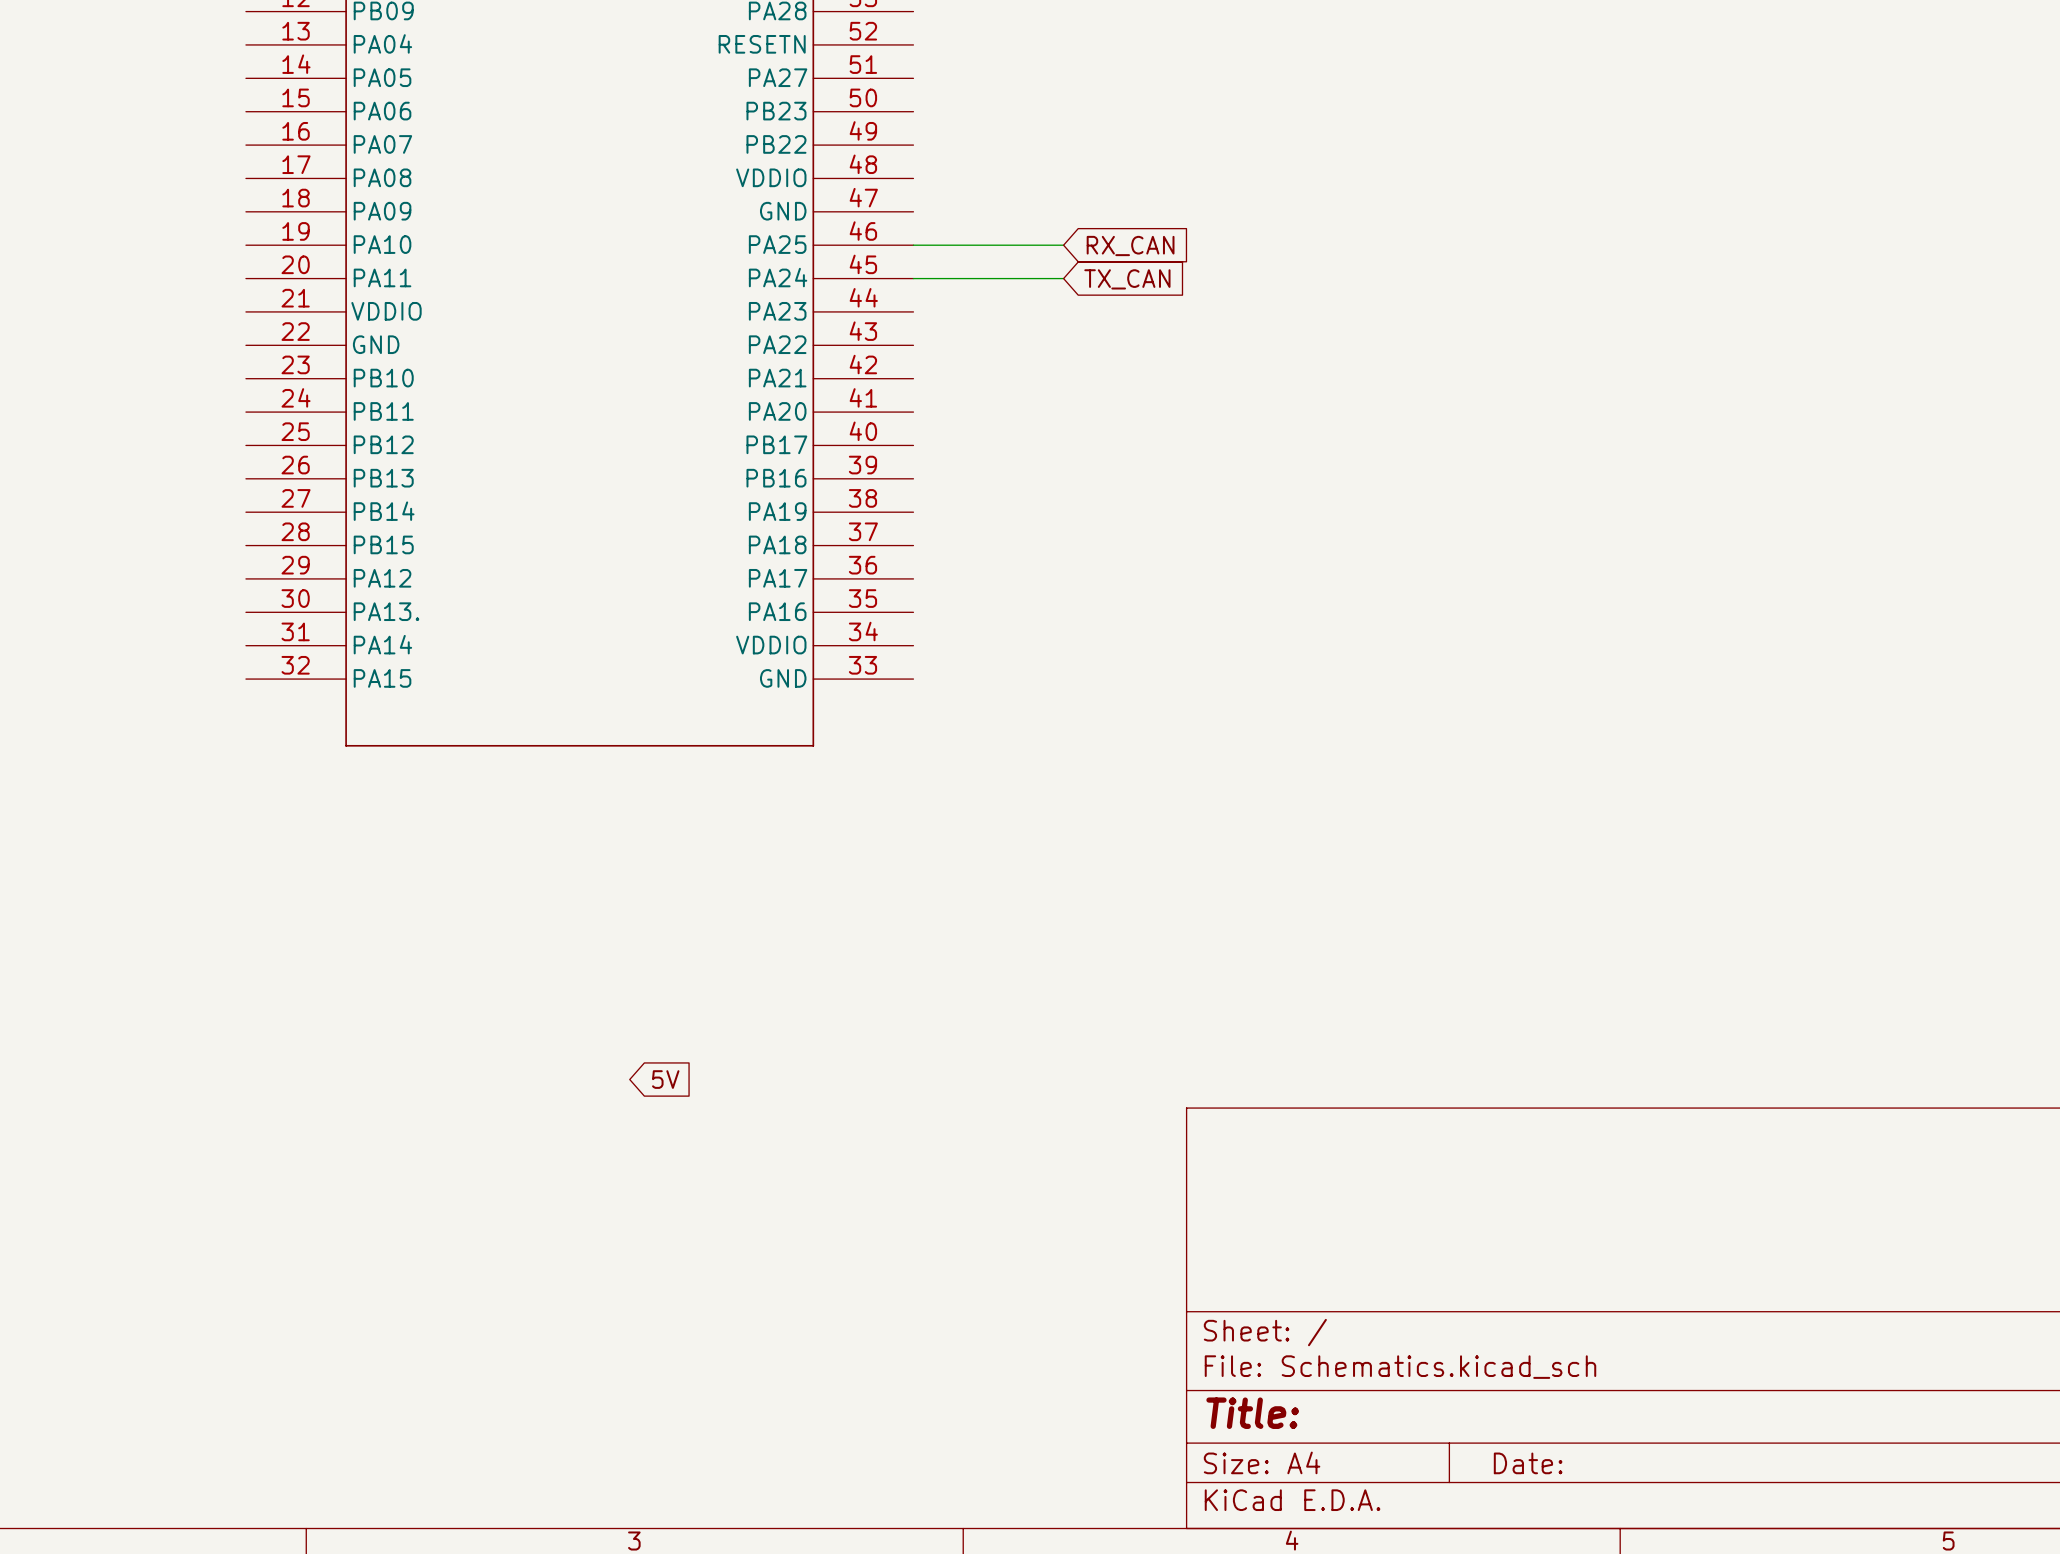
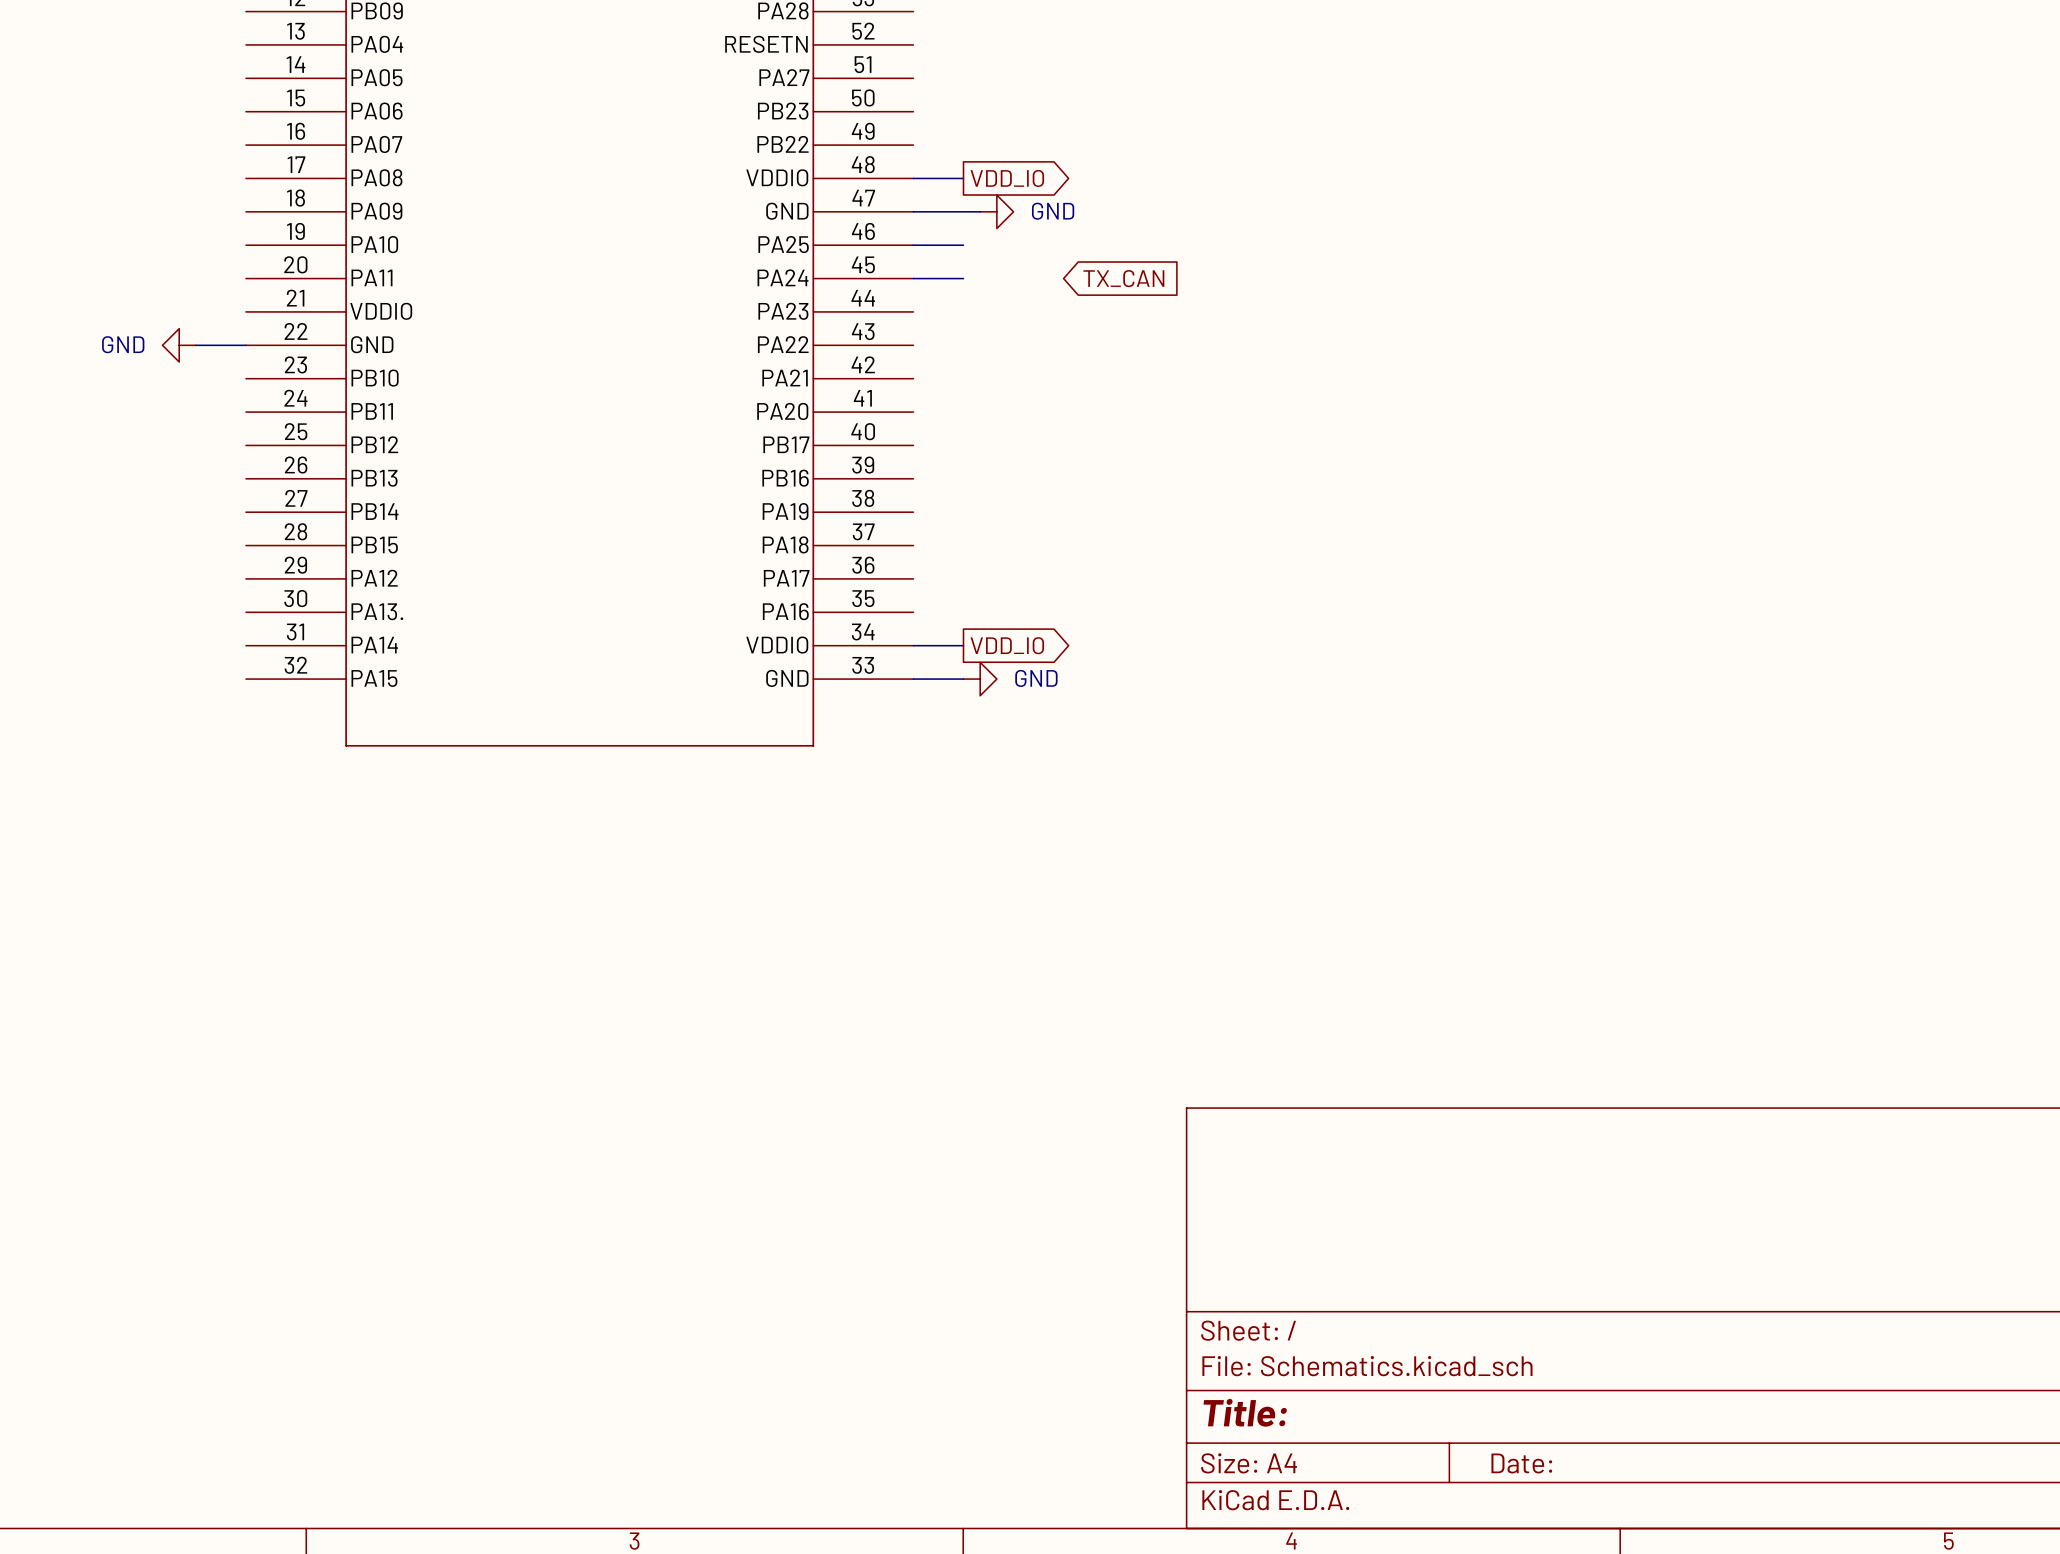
wire: none -> (913, 178) (963, 178)
global label: none -> VDD_IO (1007, 178)
wire: none -> (913, 211) (980, 211)
power symbol: none -> GND (996, 211)
wire: (963, 245) (1063, 245) -> none
global label: RX_CAN (1130, 245) -> none
wire: (963, 278) (1063, 278) -> none
power symbol: none -> GND (179, 345)
wire: none -> (195, 345) (245, 345)
wire: none -> (913, 645) (963, 645)
global label: none -> VDD_IO (1007, 645)
wire: none -> (913, 679) (963, 679)
power symbol: none -> GND (980, 679)
global label: 5V (665, 1079) -> none

